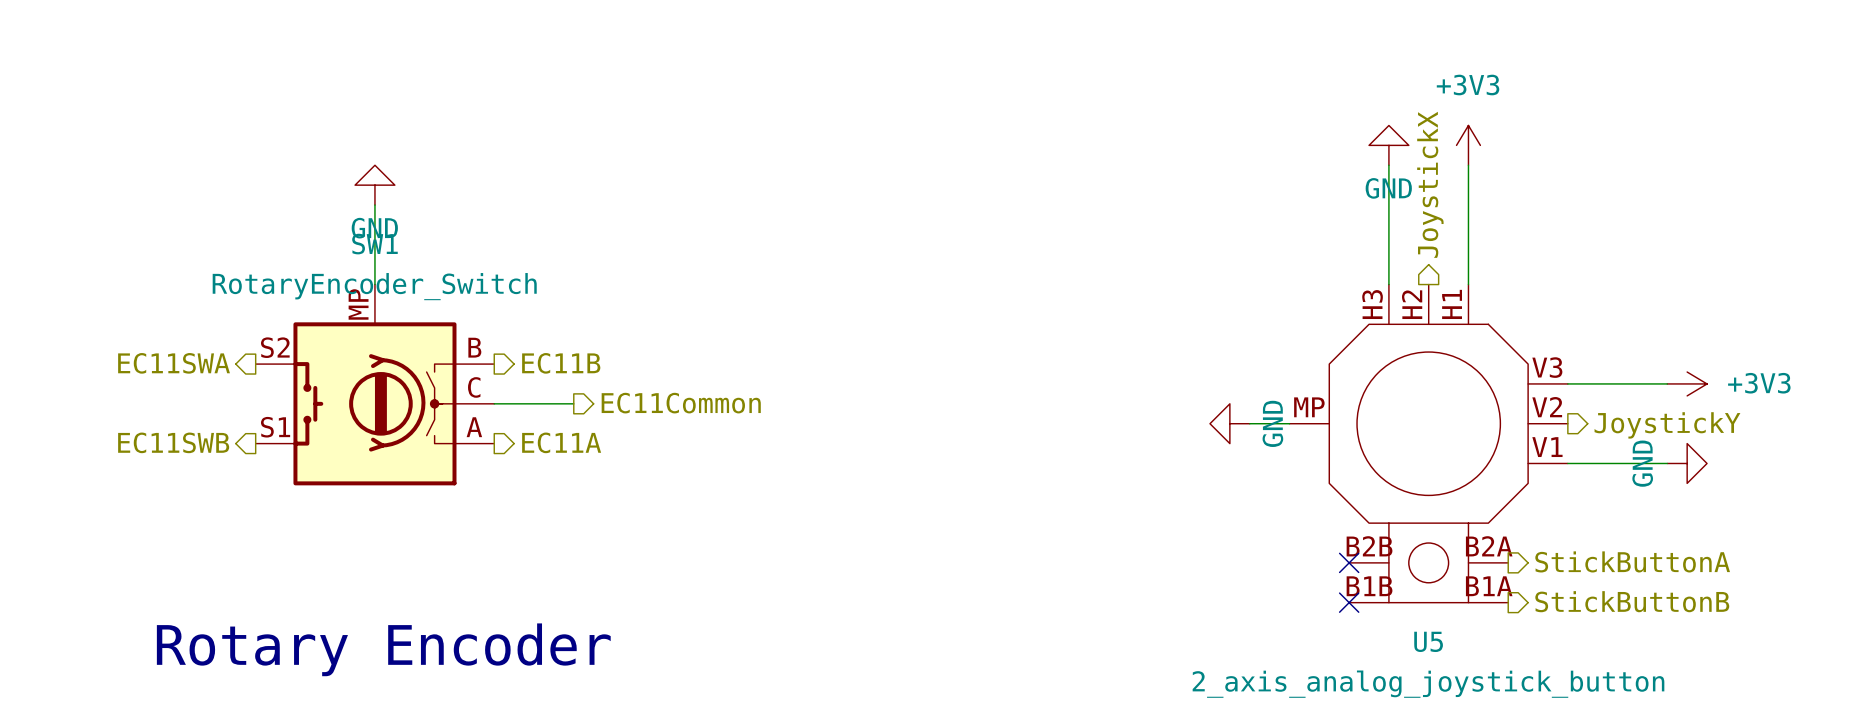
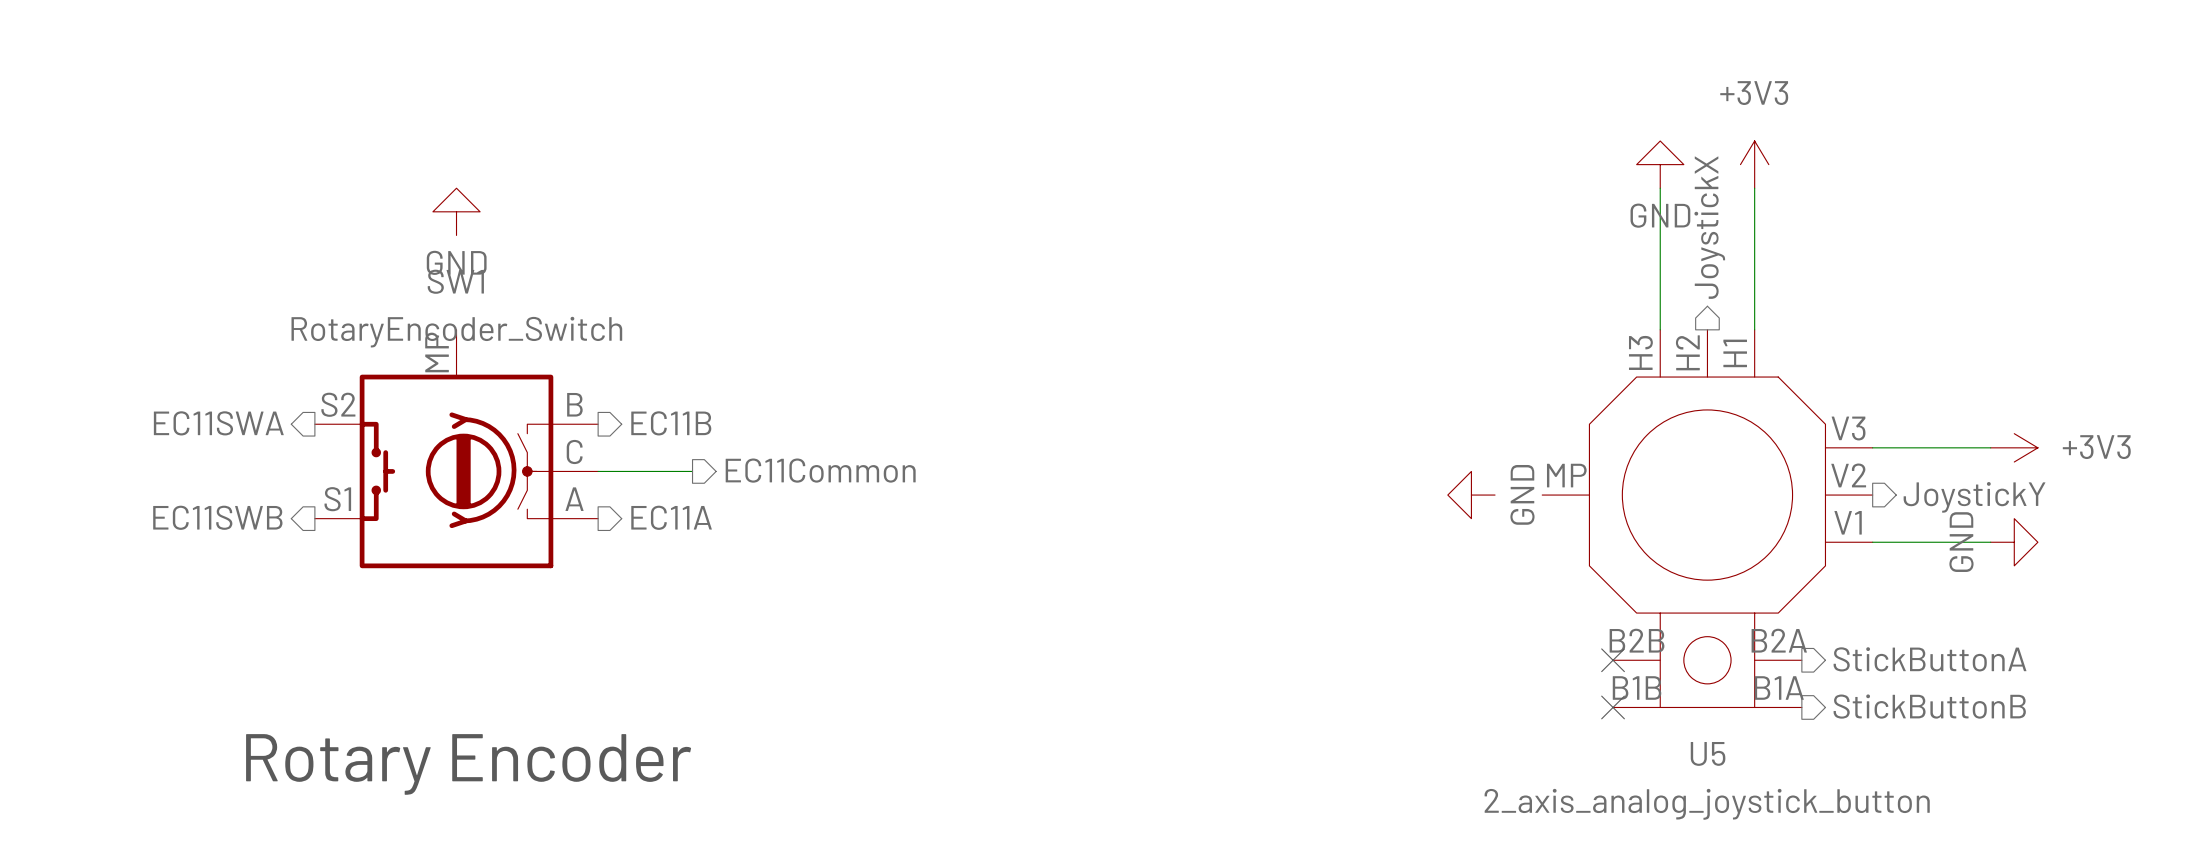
wire: (374, 205) (374, 284) -> none
wire: (1249, 423) (1289, 423) -> none

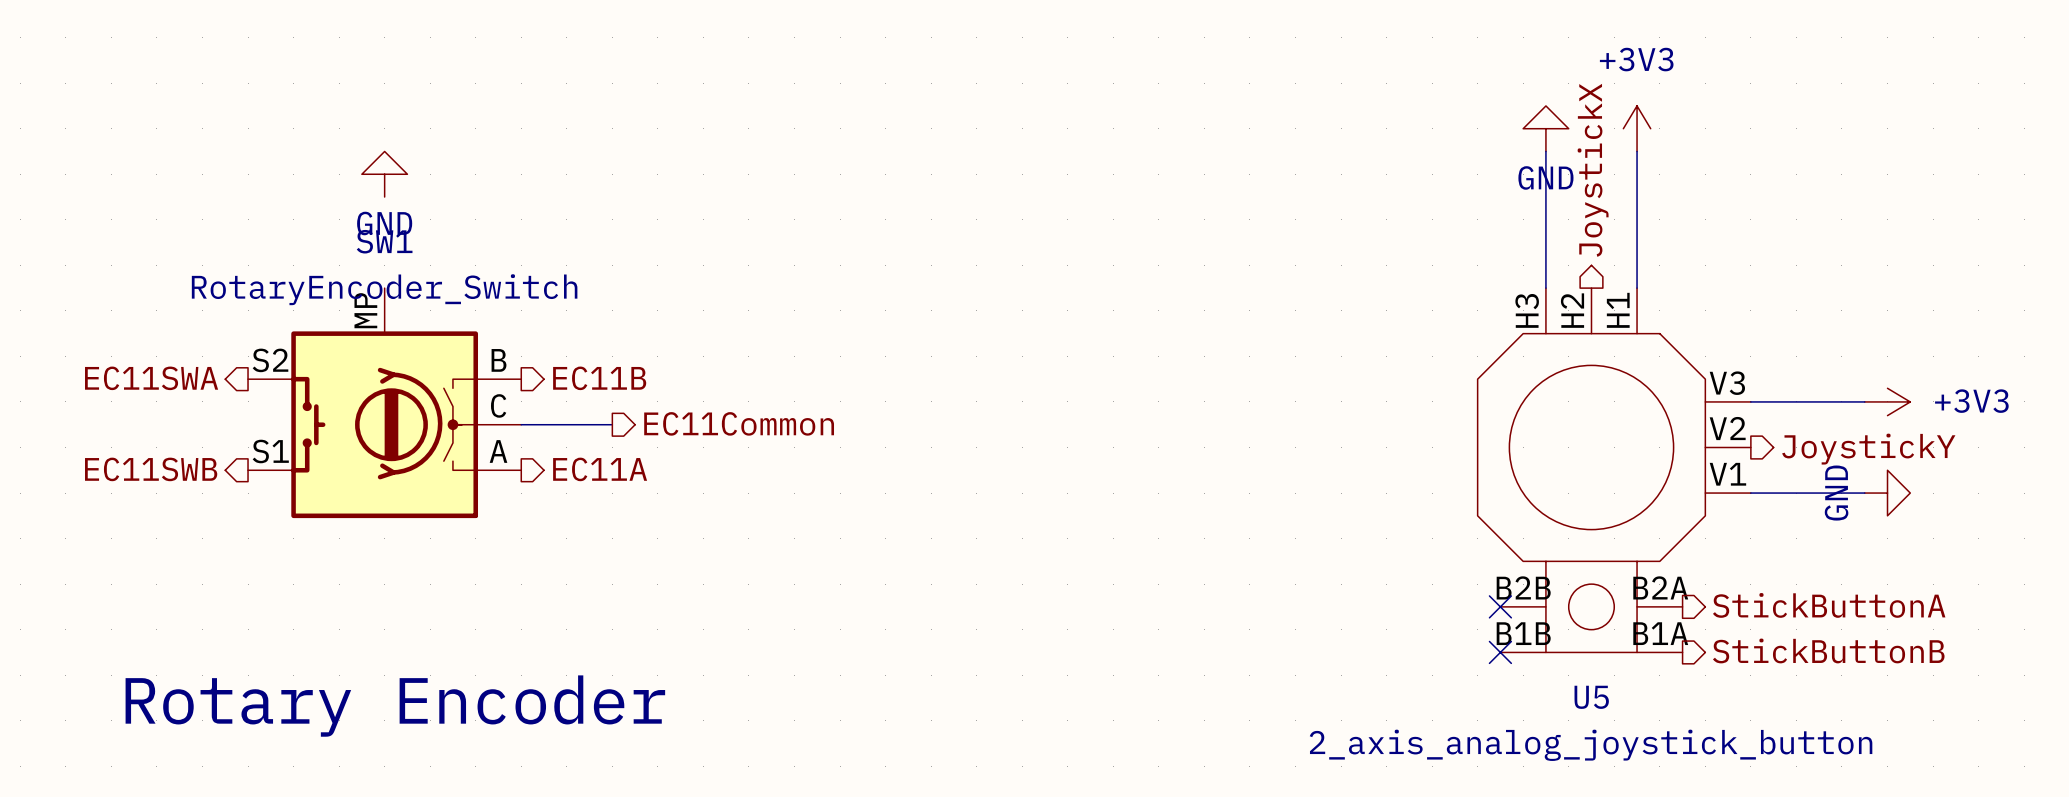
U5 symbol: [1542, 329, 1873, 708] -> [1477, 288, 1751, 653]
power symbol: GND (1471, 495) -> none

